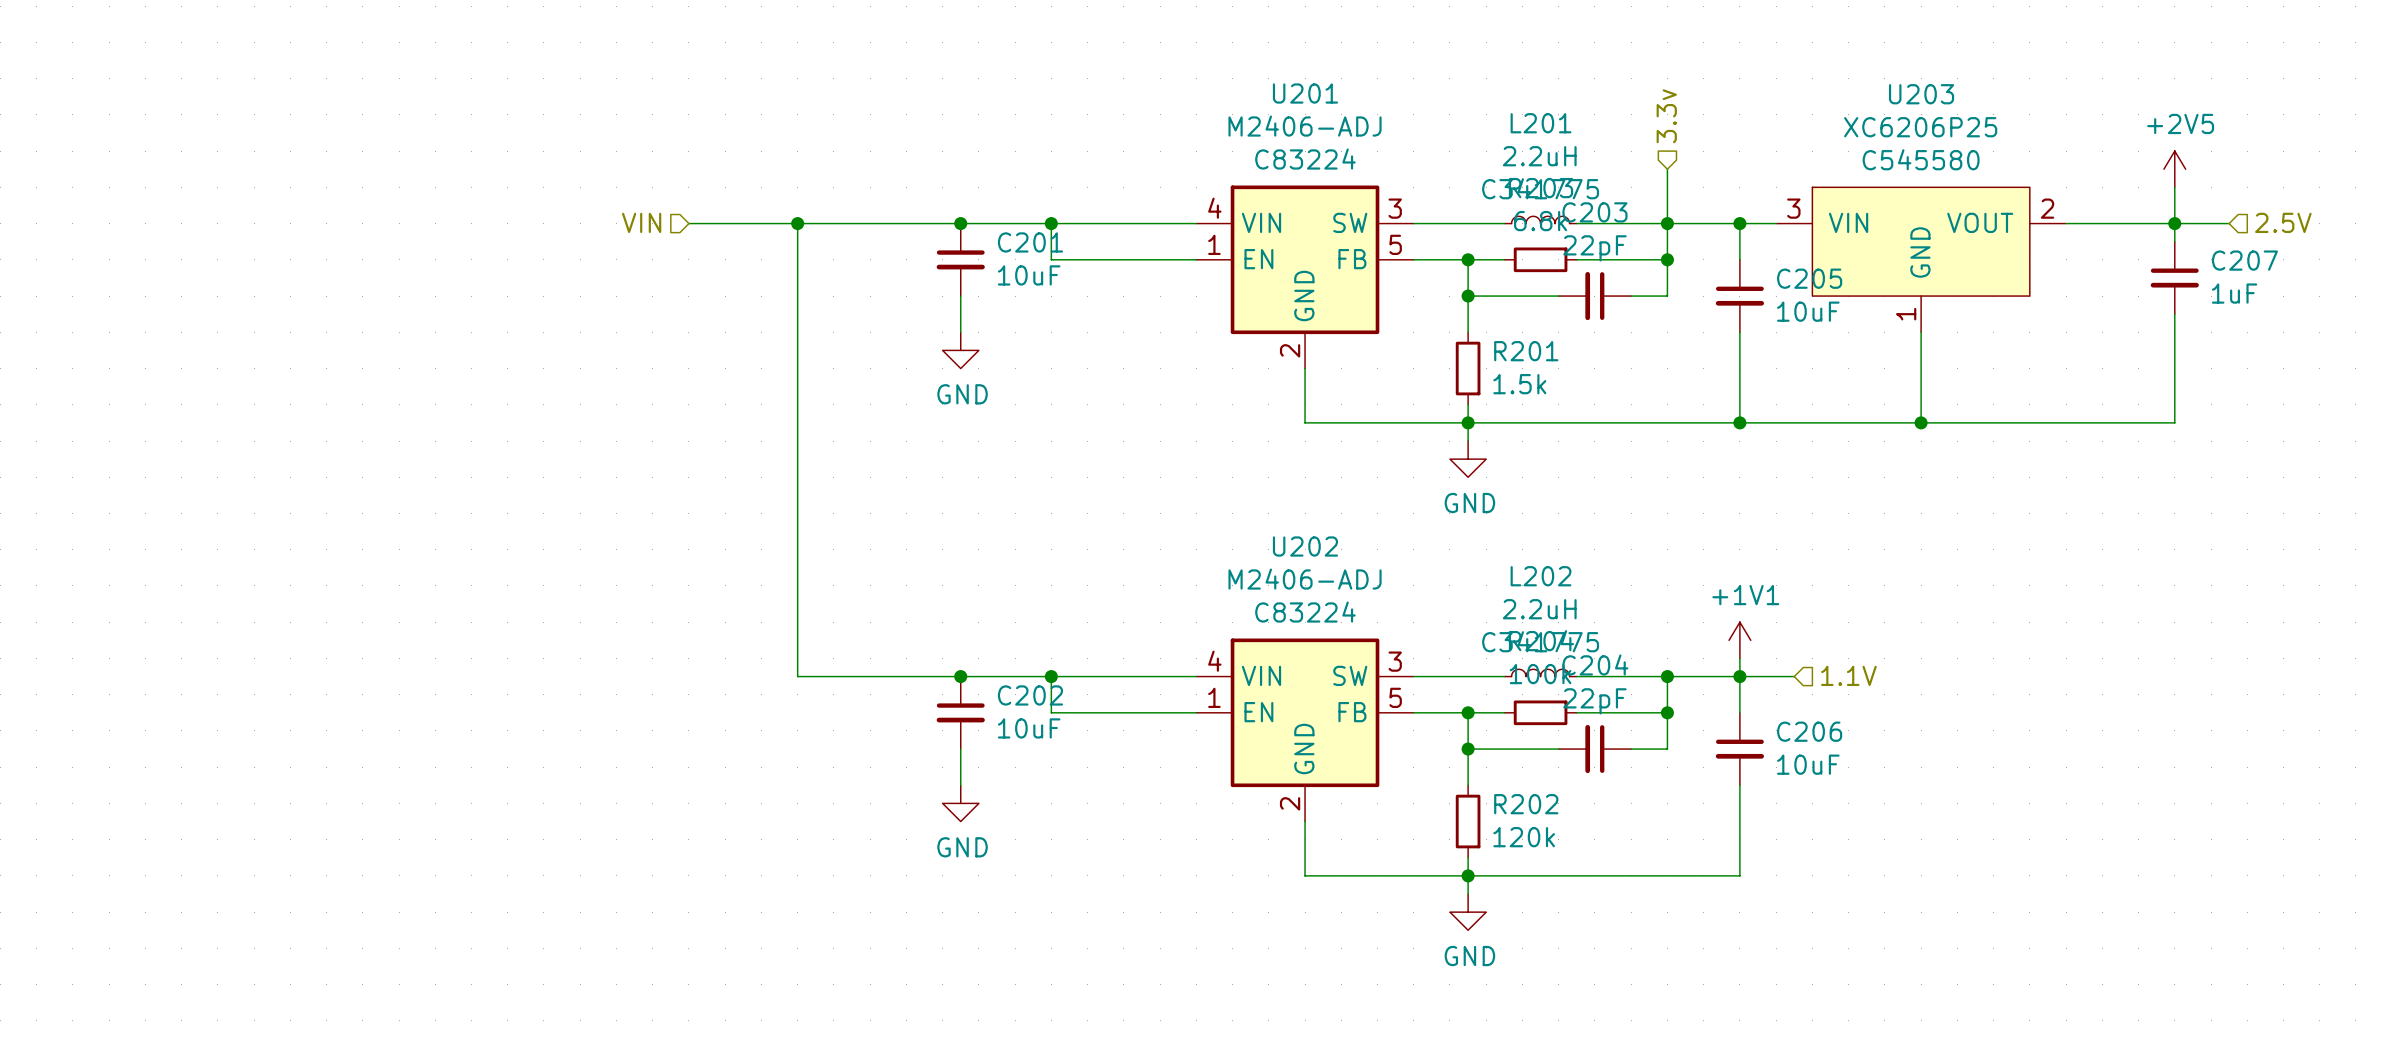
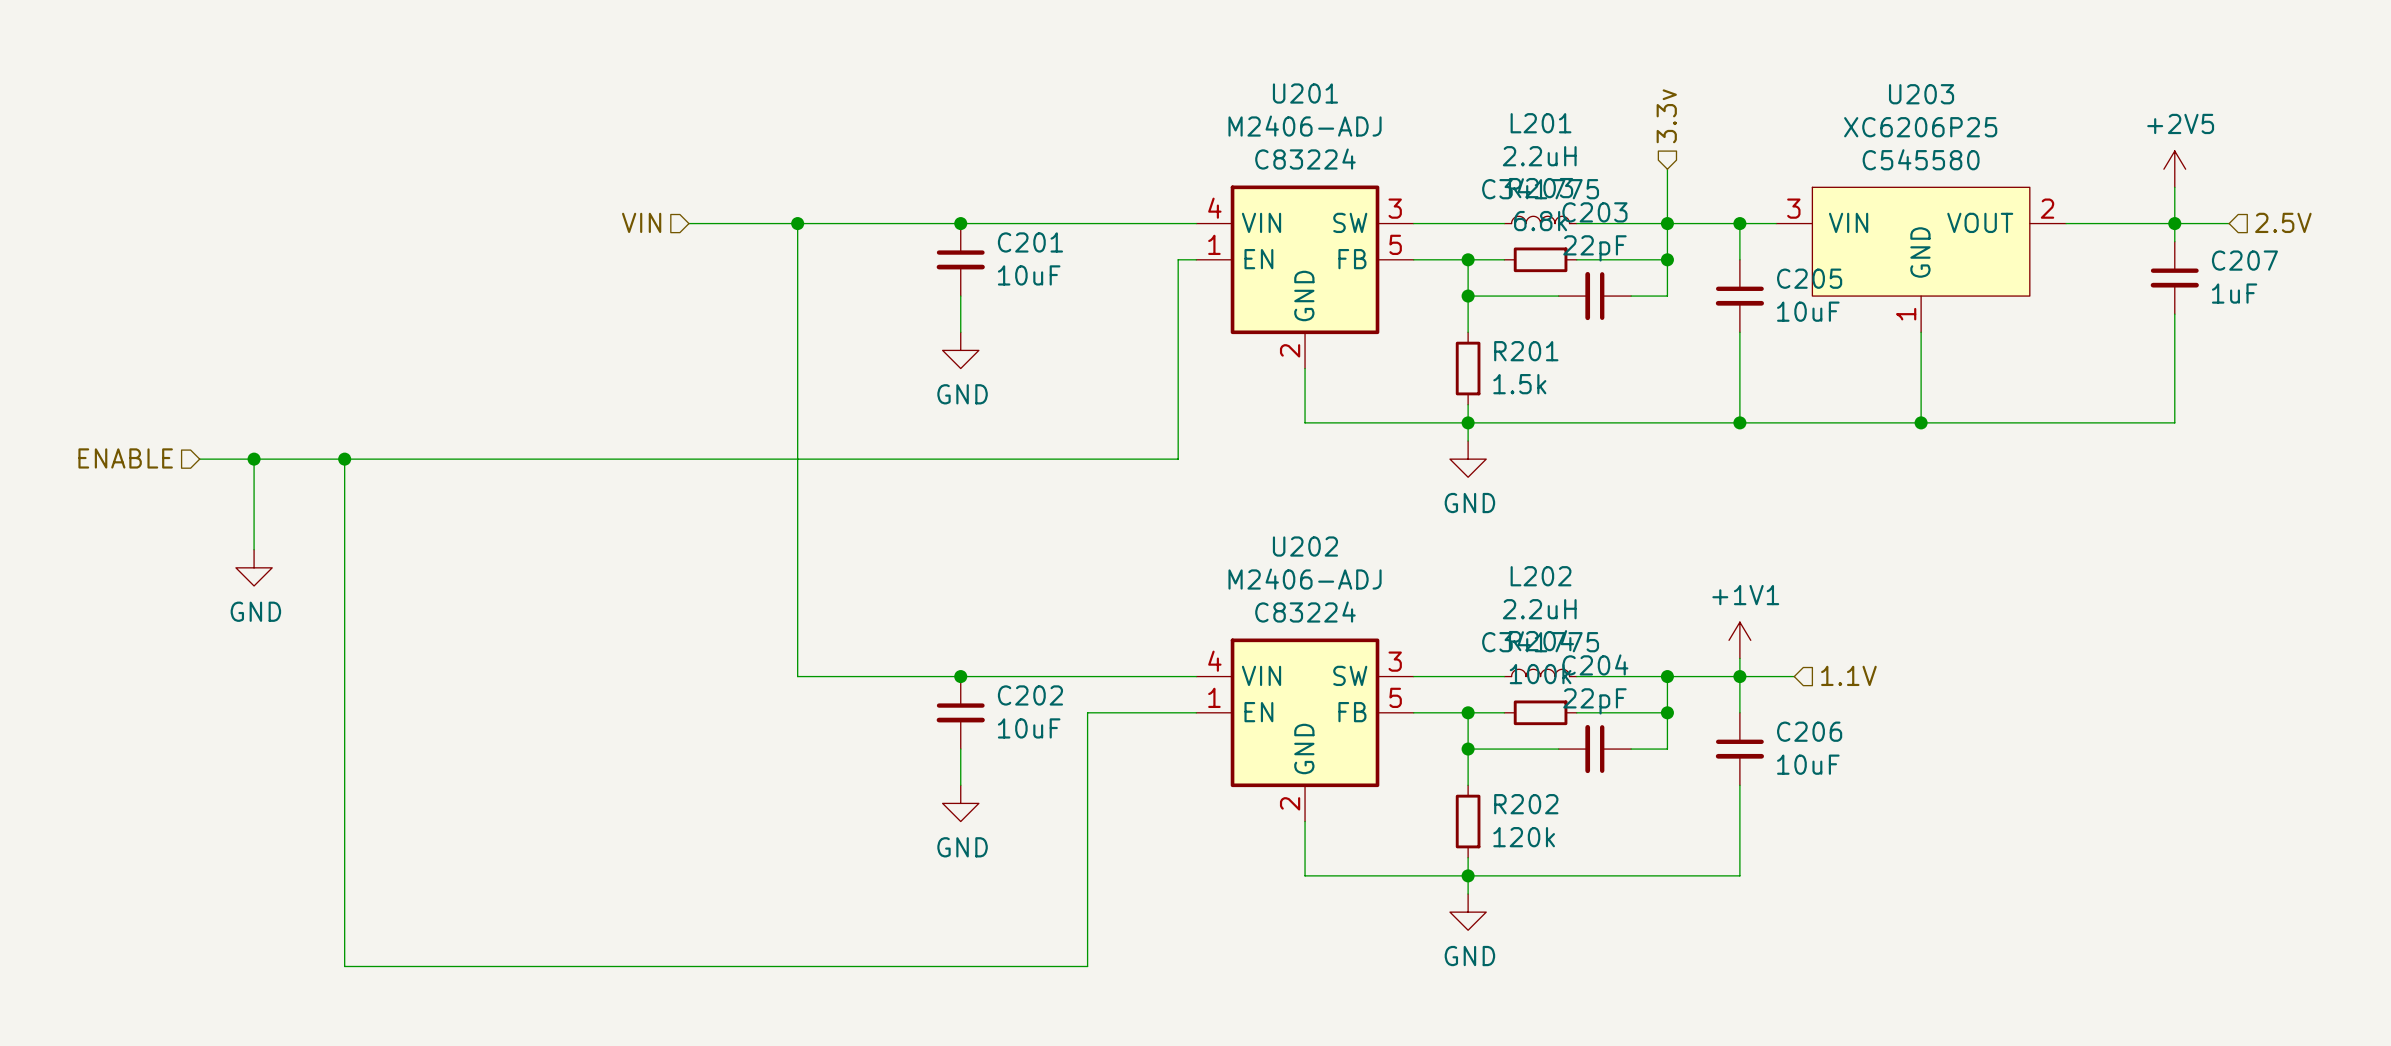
wire: (1051, 223) (1051, 259) (1178, 259) -> (199, 459) (1178, 459) (1178, 259)
junction: (1051, 223) -> none
hierarchical label: none -> ENABLE (125, 458)
wire: none -> (254, 459) (254, 549)
junction: none -> (254, 459)
junction: none -> (344, 459)
power symbol: none -> GND (254, 567)
wire: (1051, 676) (1051, 712) (1087, 712) -> (344, 459) (344, 966) (1087, 966) (1087, 712)
junction: (1051, 676) -> none

